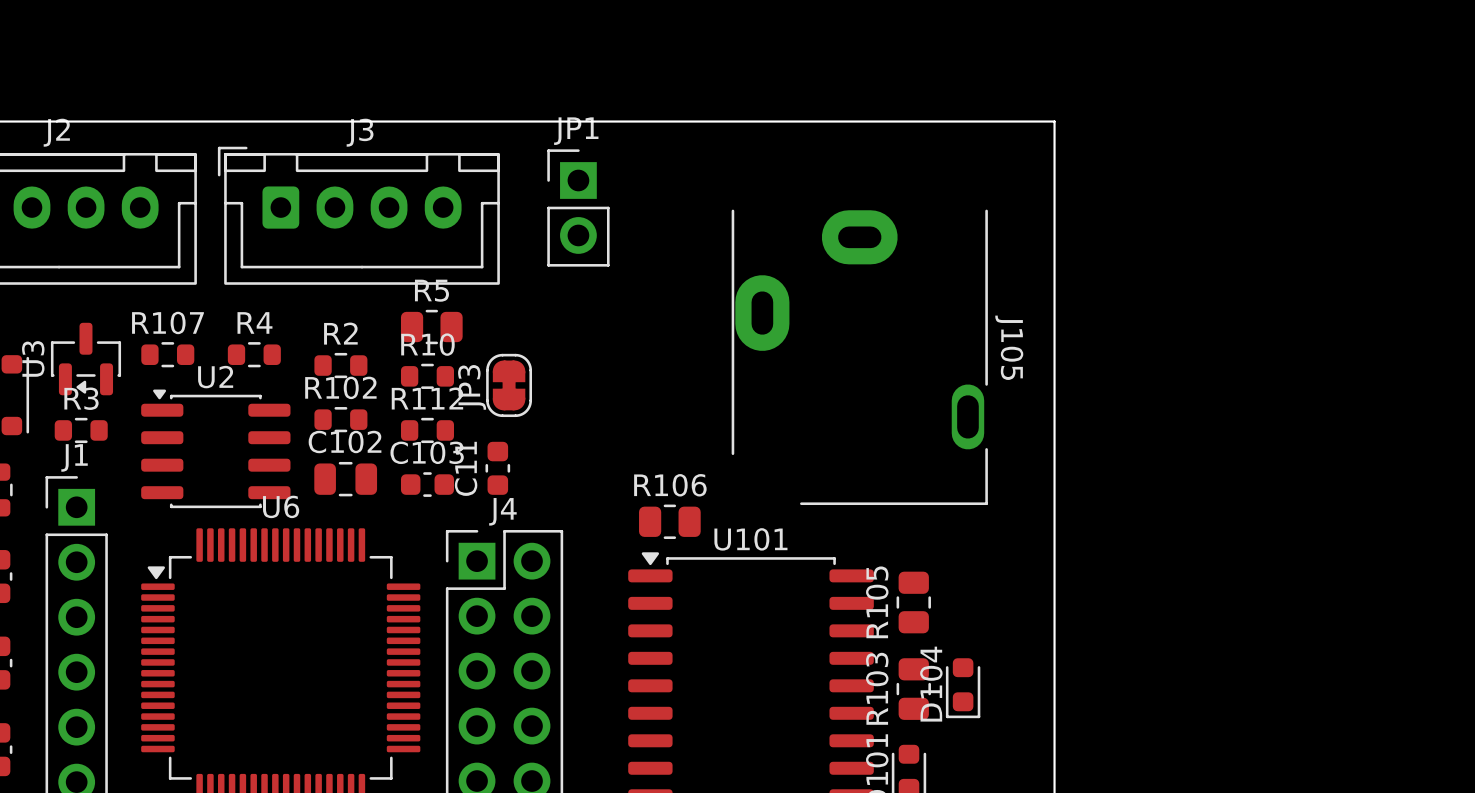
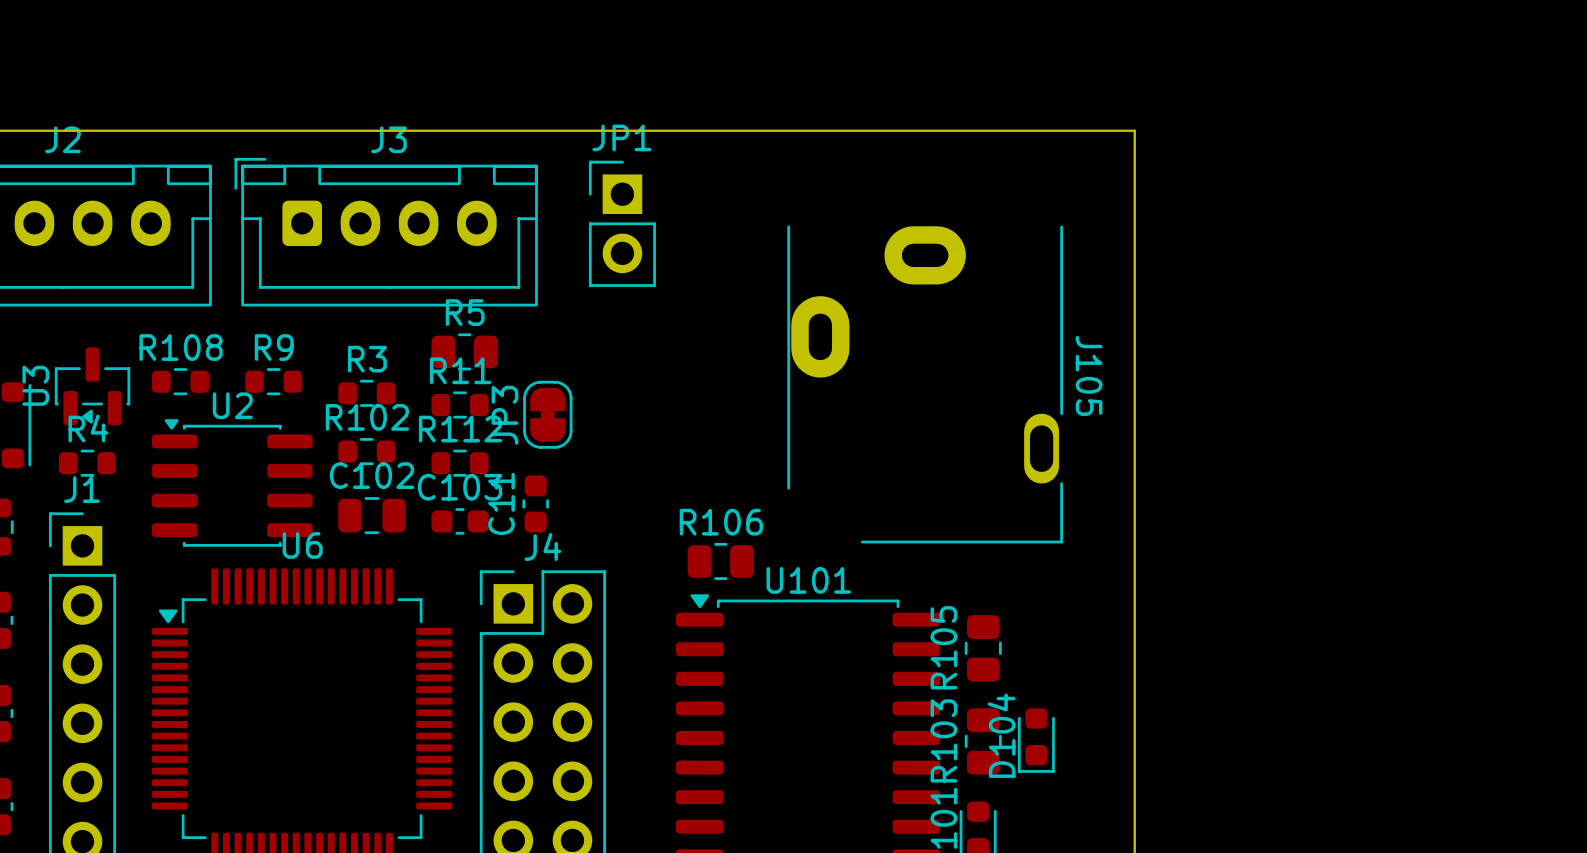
R107 name: R107 (167, 322) -> R108 (181, 347)
R4 name: R4 (254, 322) -> R9 (274, 347)
R2 name: R2 (340, 333) -> R3 (367, 359)
R10 name: R10 (427, 344) -> R11 (460, 370)
R3 name: R3 (81, 398) -> R4 (88, 428)

